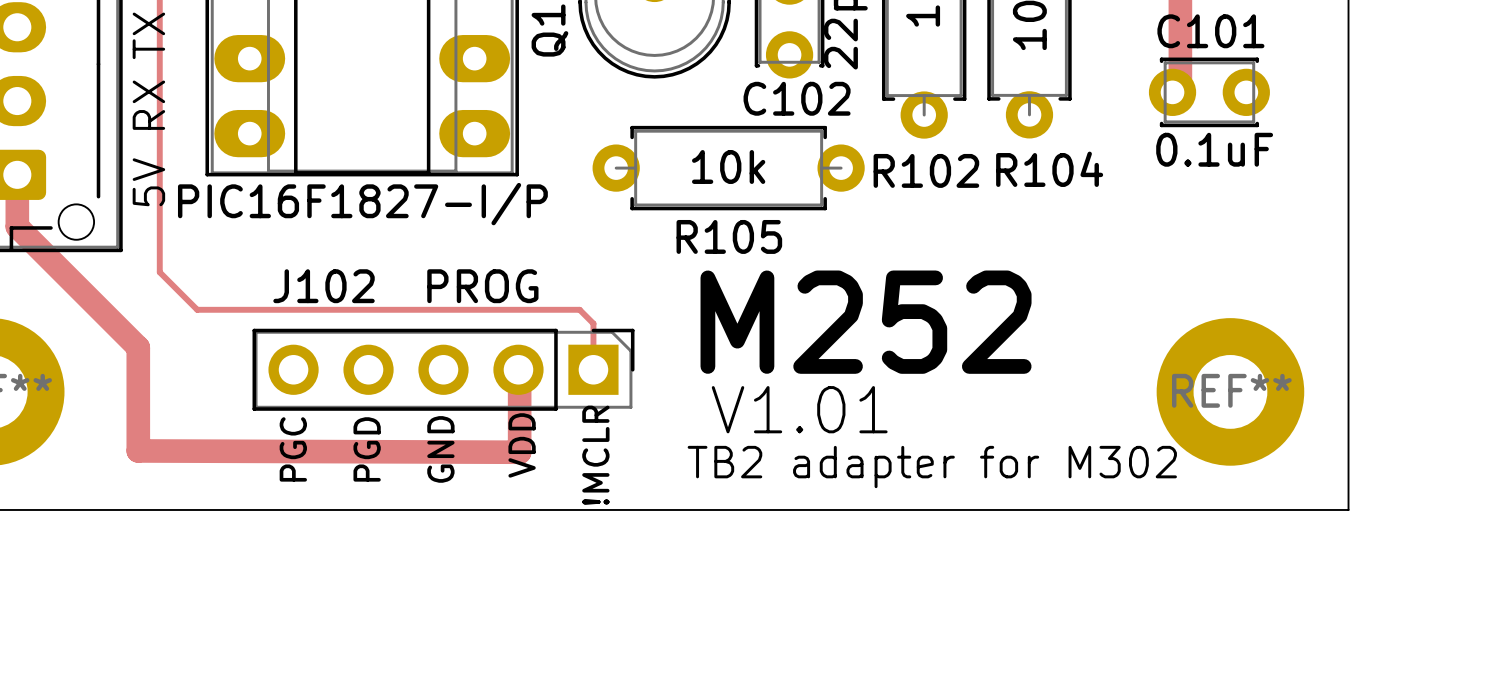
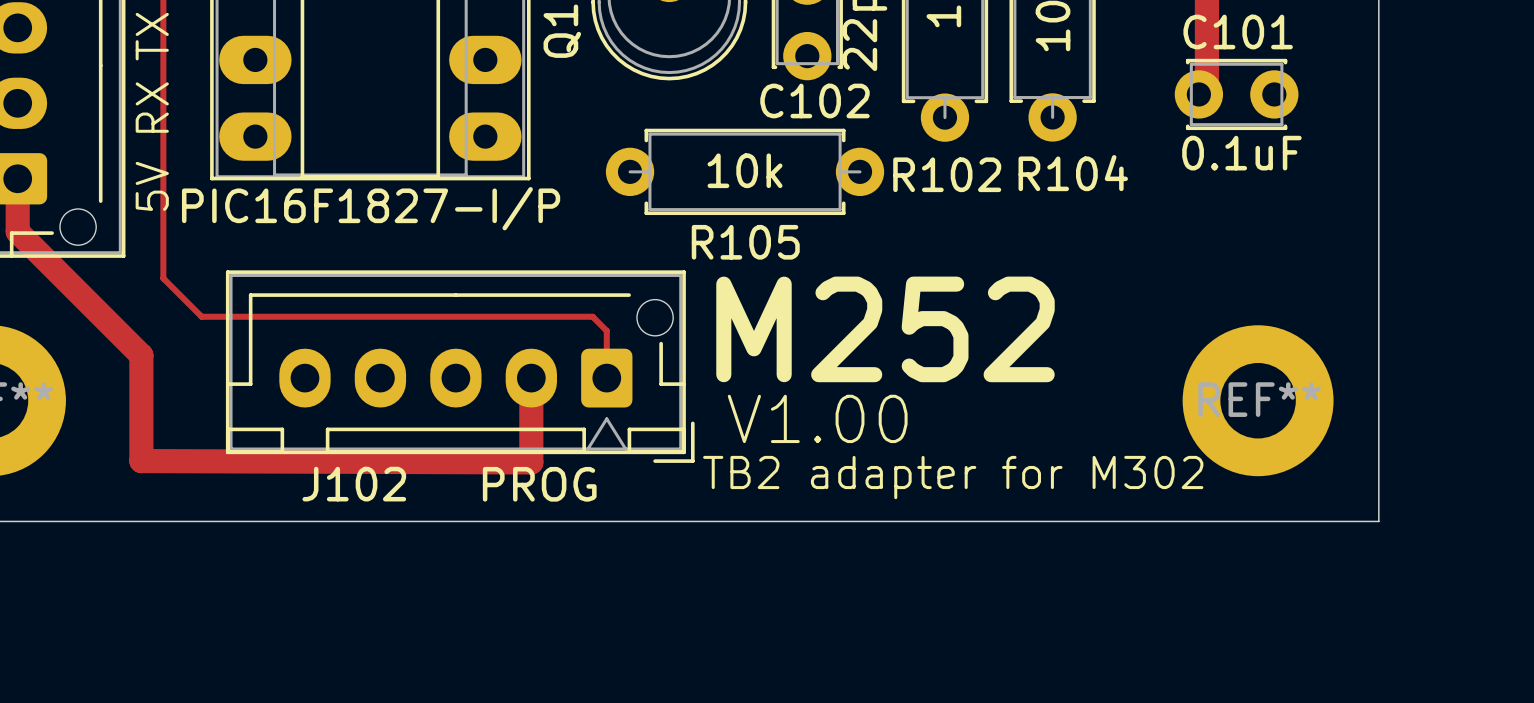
J102 name position: J102 (324, 286) -> J102 (354, 484)
J102 value position: PROG (482, 286) -> PROG (539, 484)
J102 footprint: [252, 328, 635, 411] -> [225, 270, 695, 463]
text: V1.01 (799, 409) -> V1.00 (817, 418)
text: VDD (522, 445) -> none
text: PGC (293, 449) -> none
text: PGD (367, 449) -> none
text: GND (440, 449) -> none
text: !MCLR (595, 455) -> none

